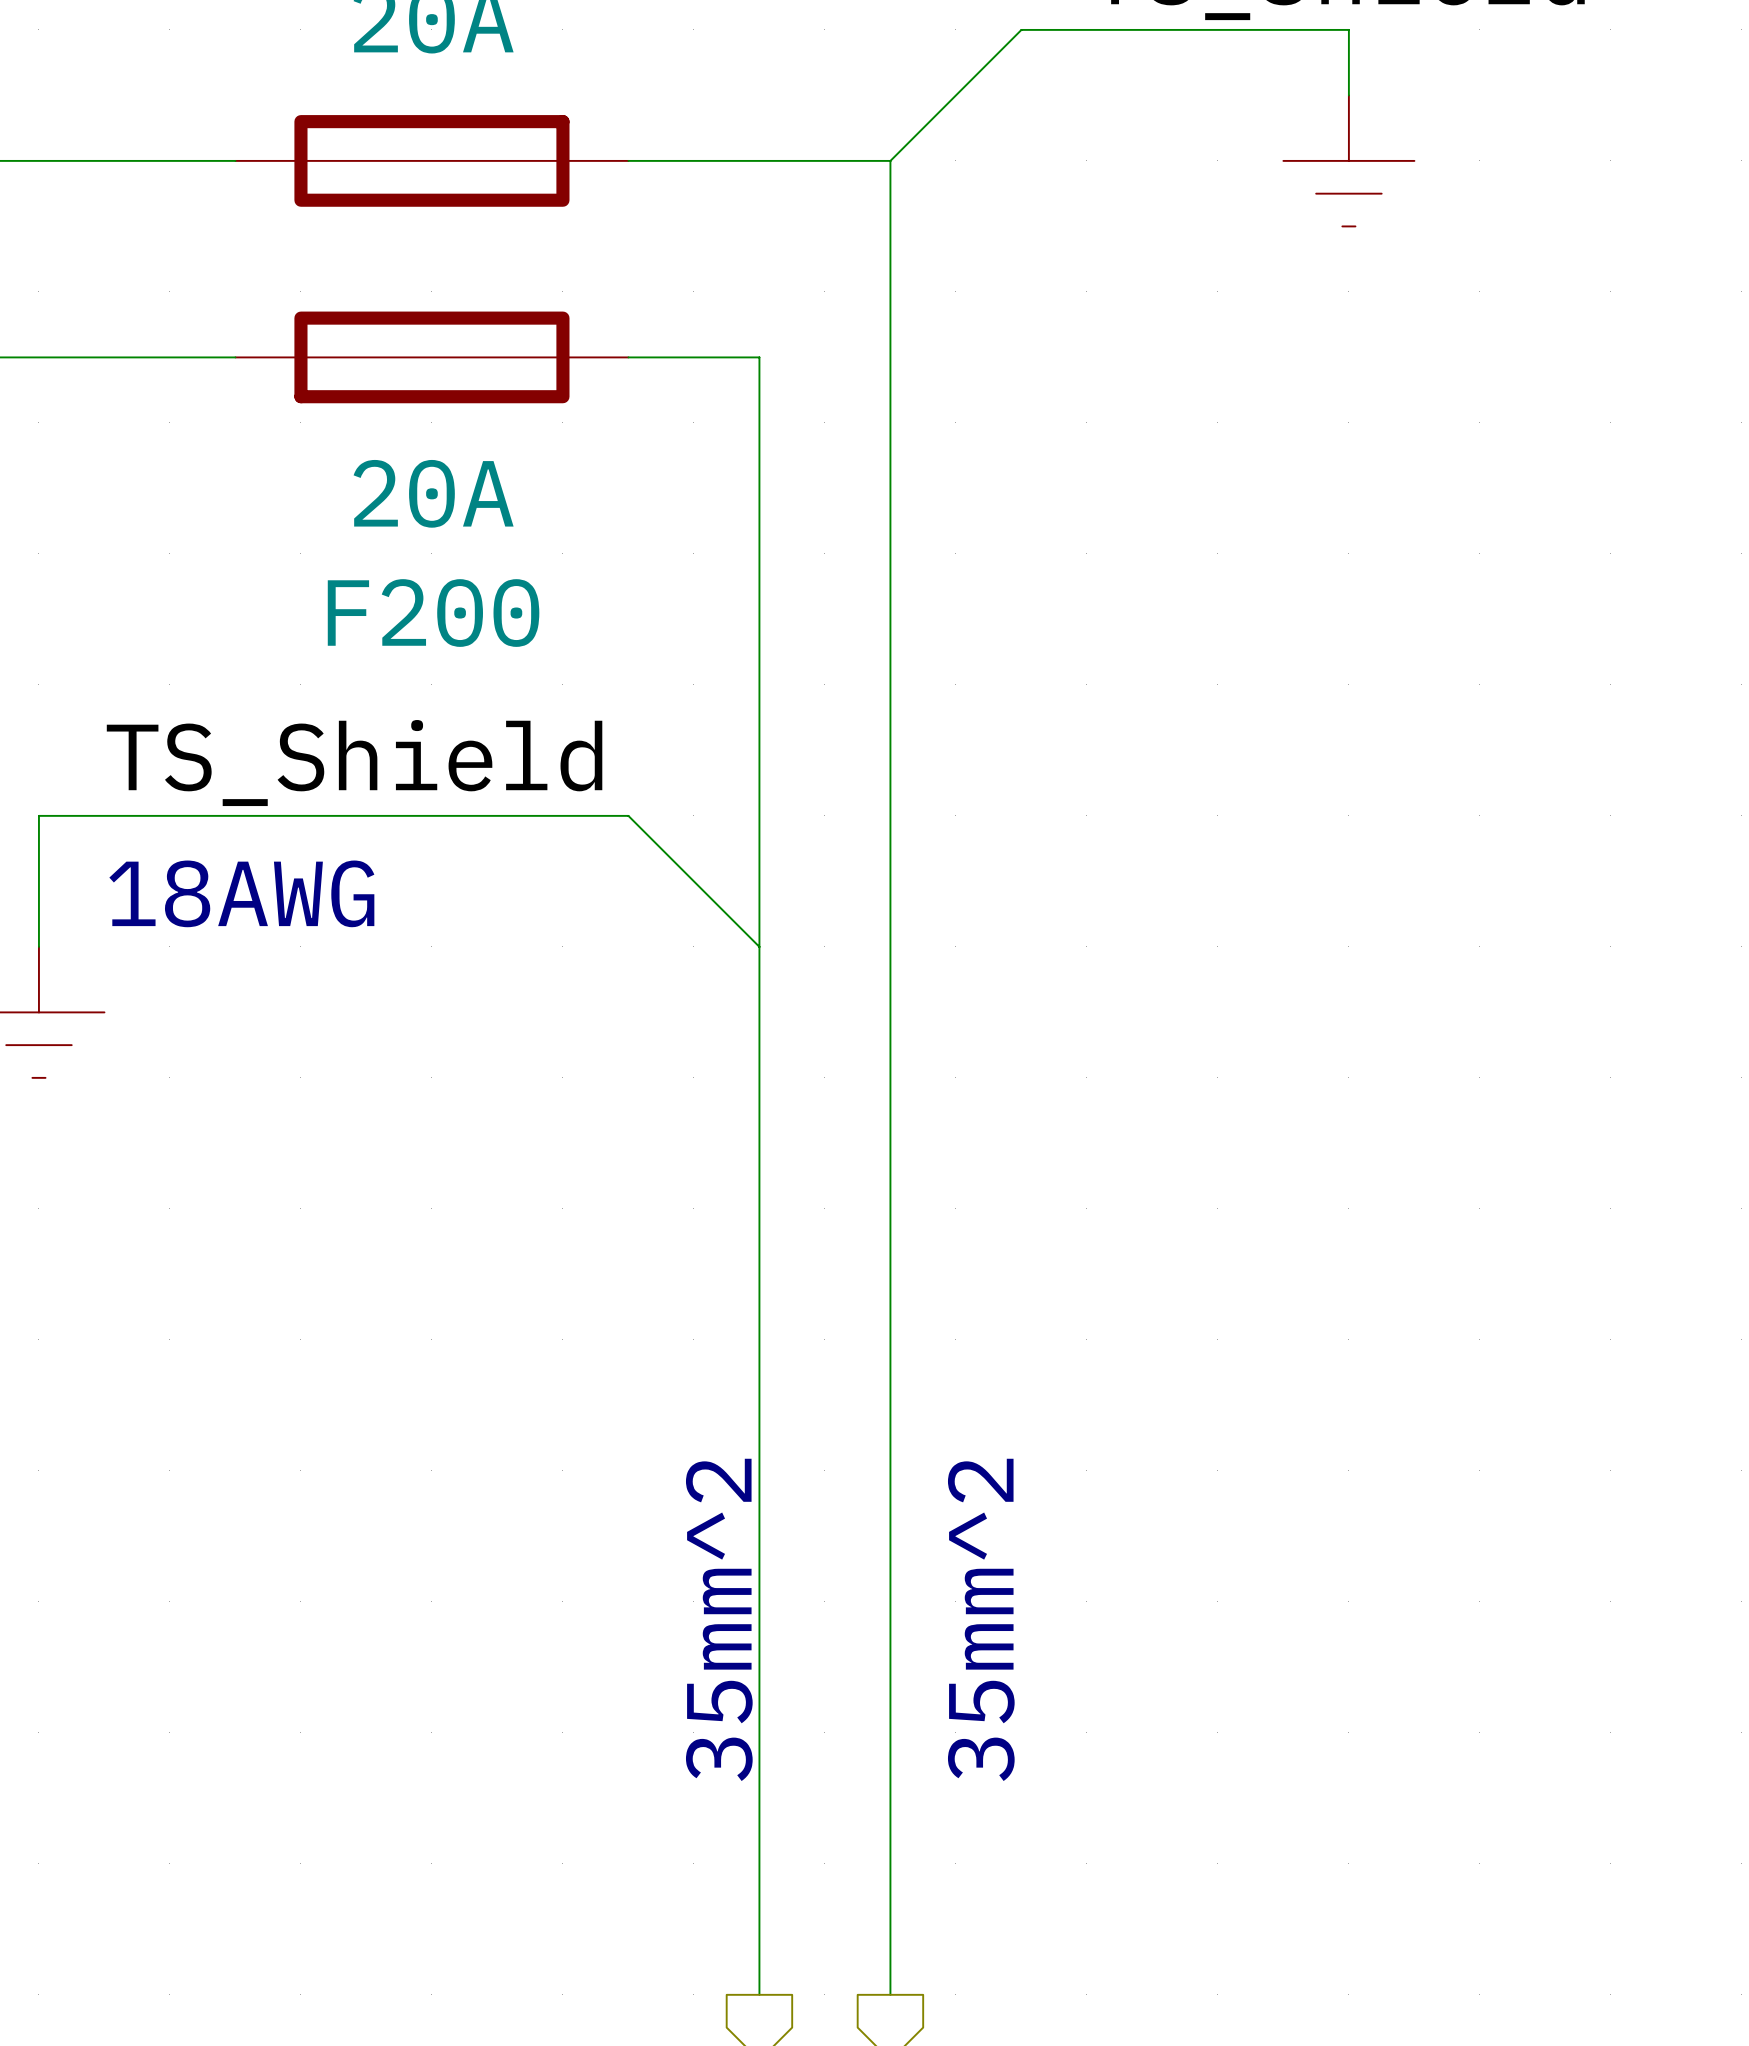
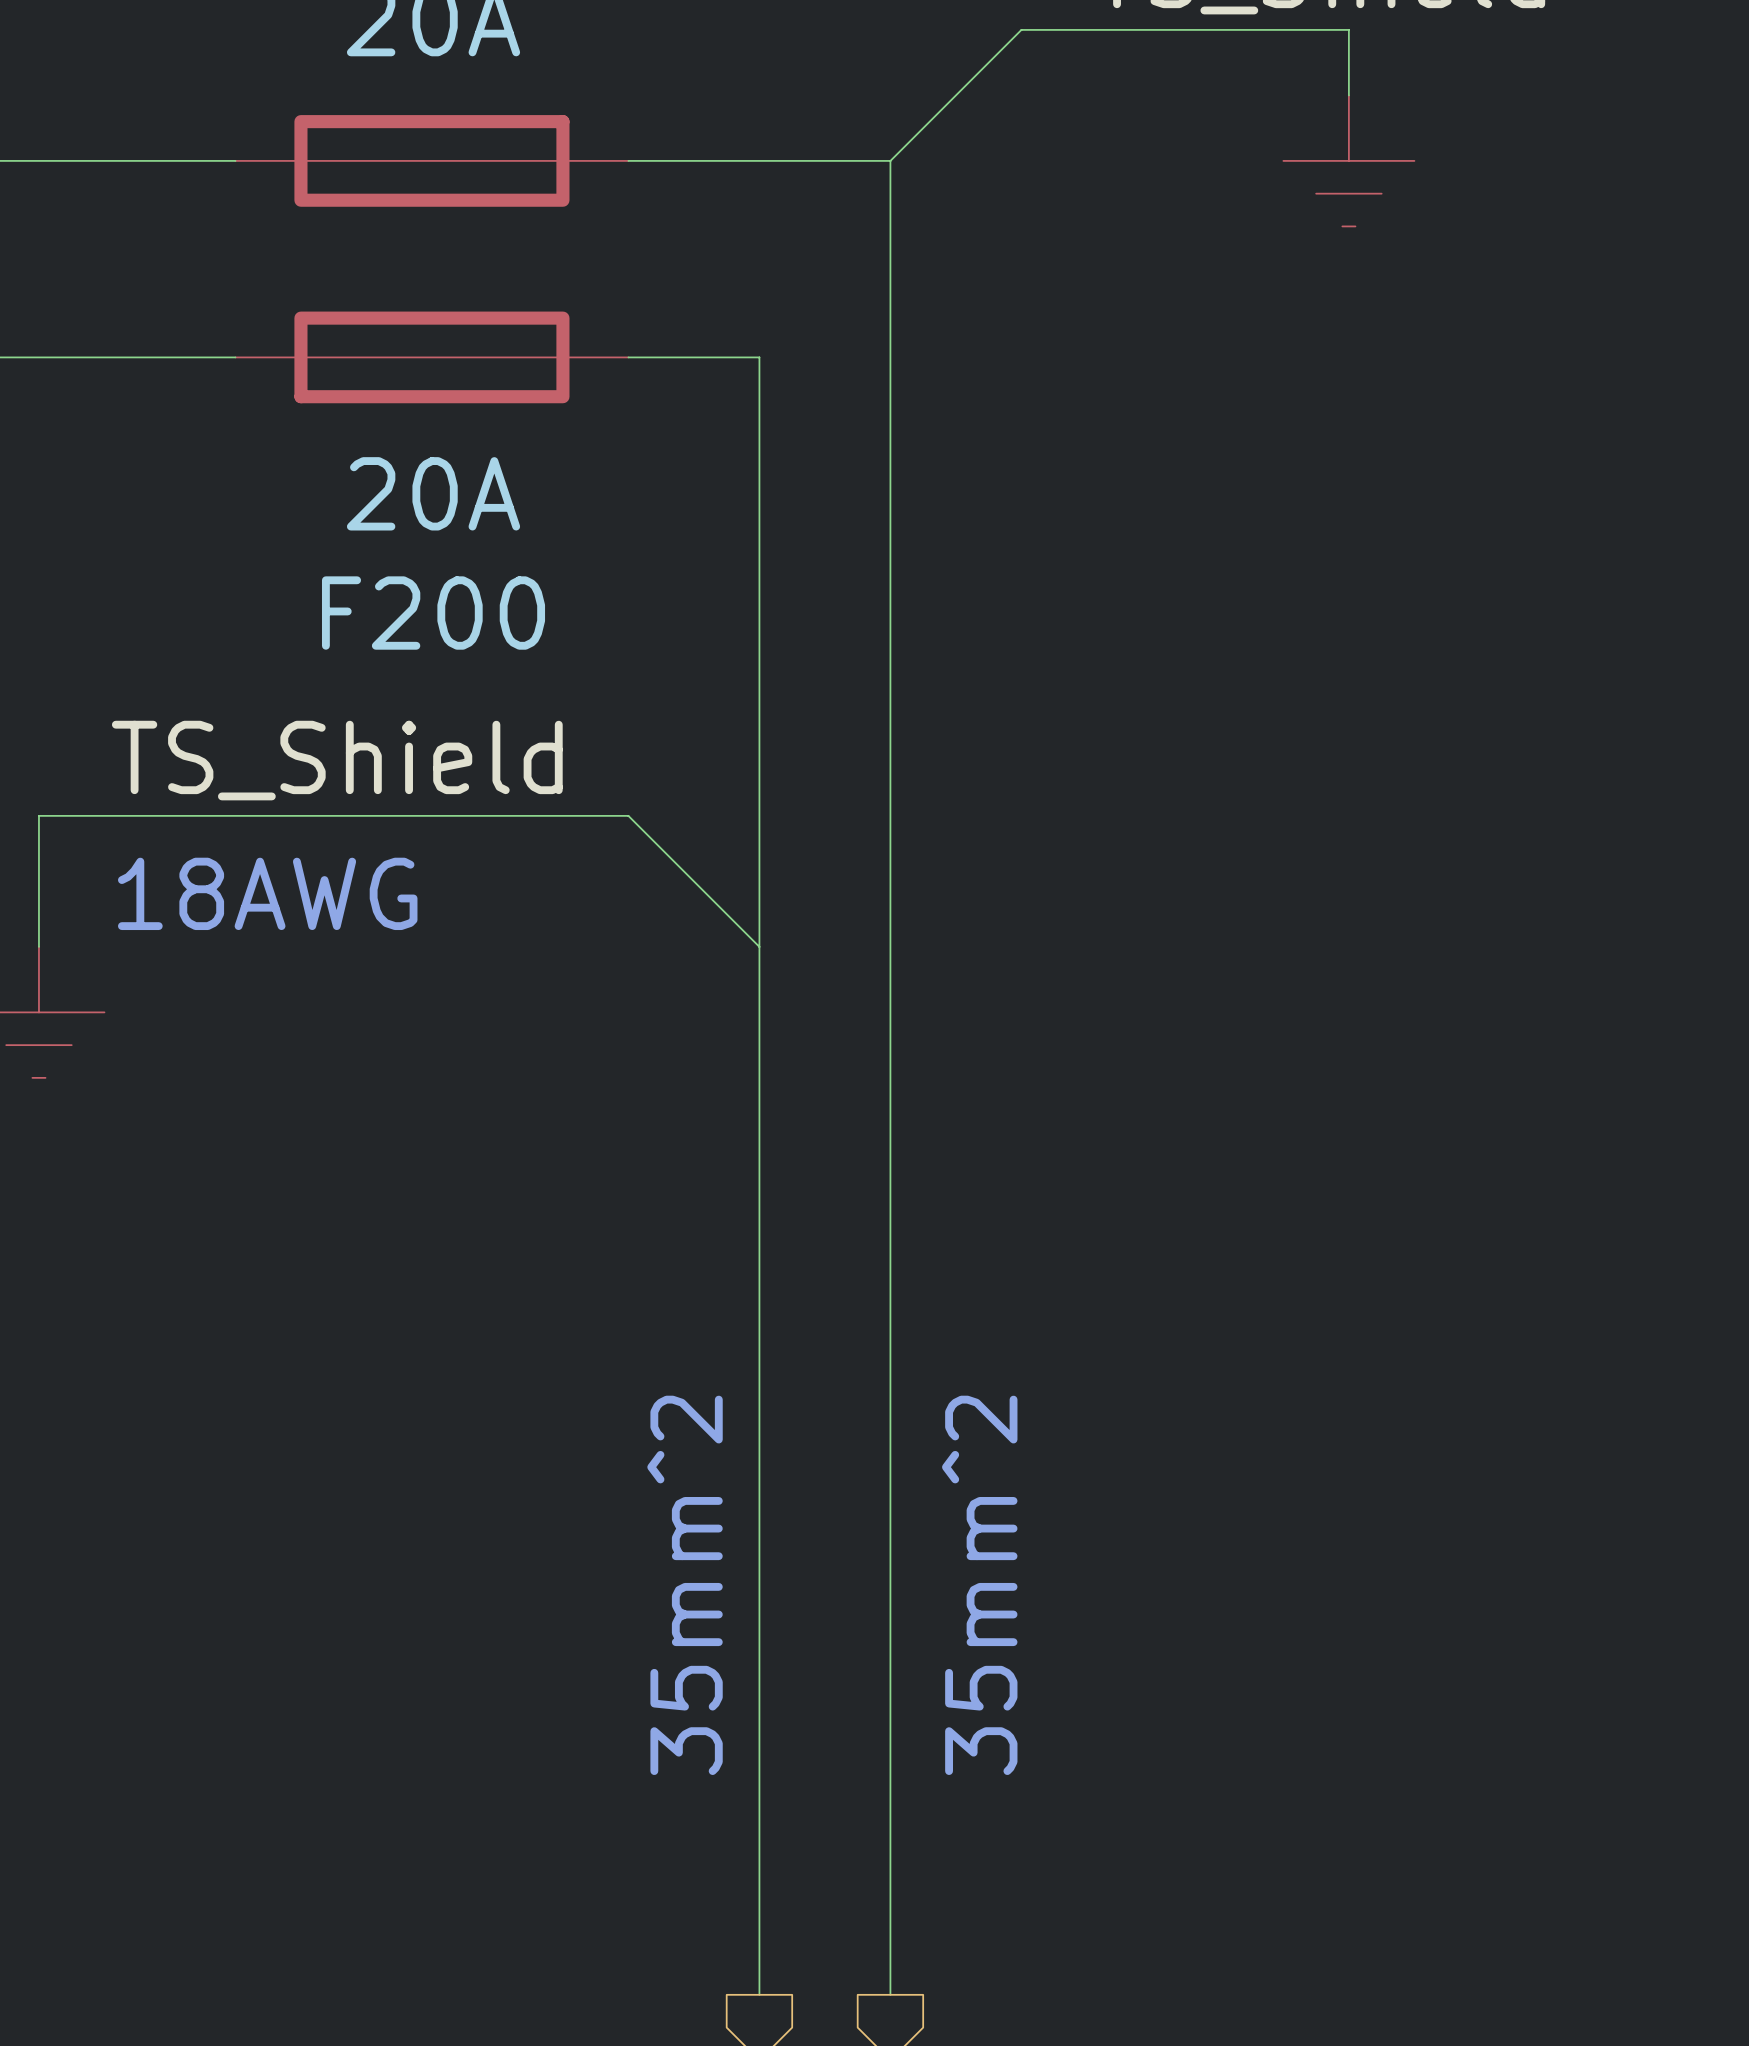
text position: 35mm^2 (719, 1619) -> 35mm^2 (685, 1585)

